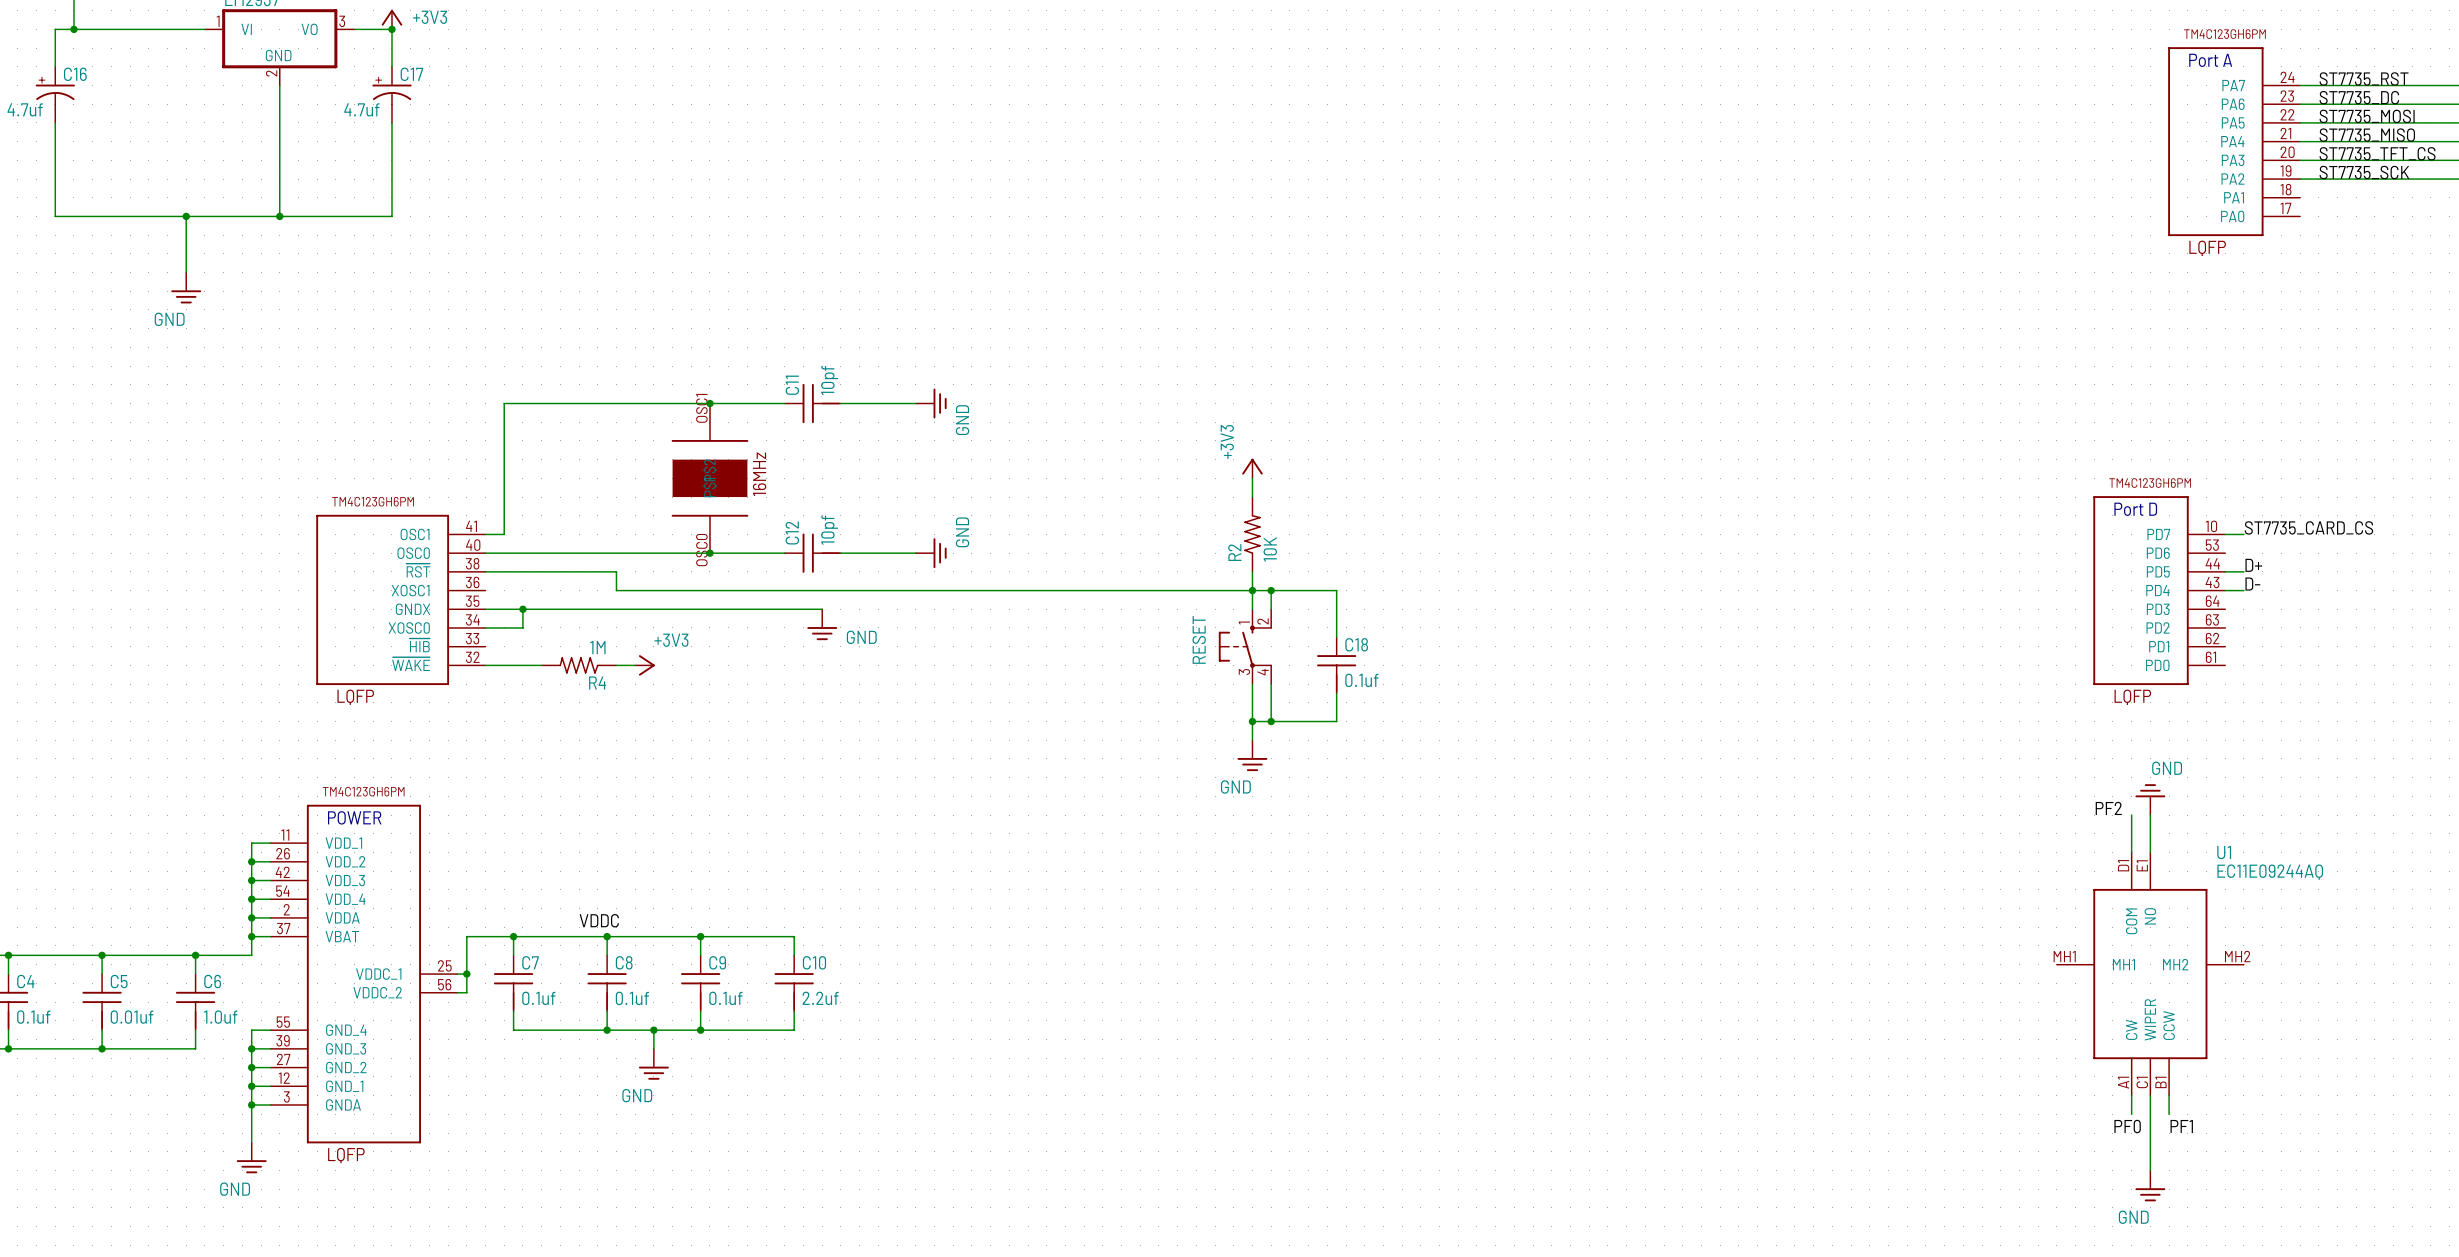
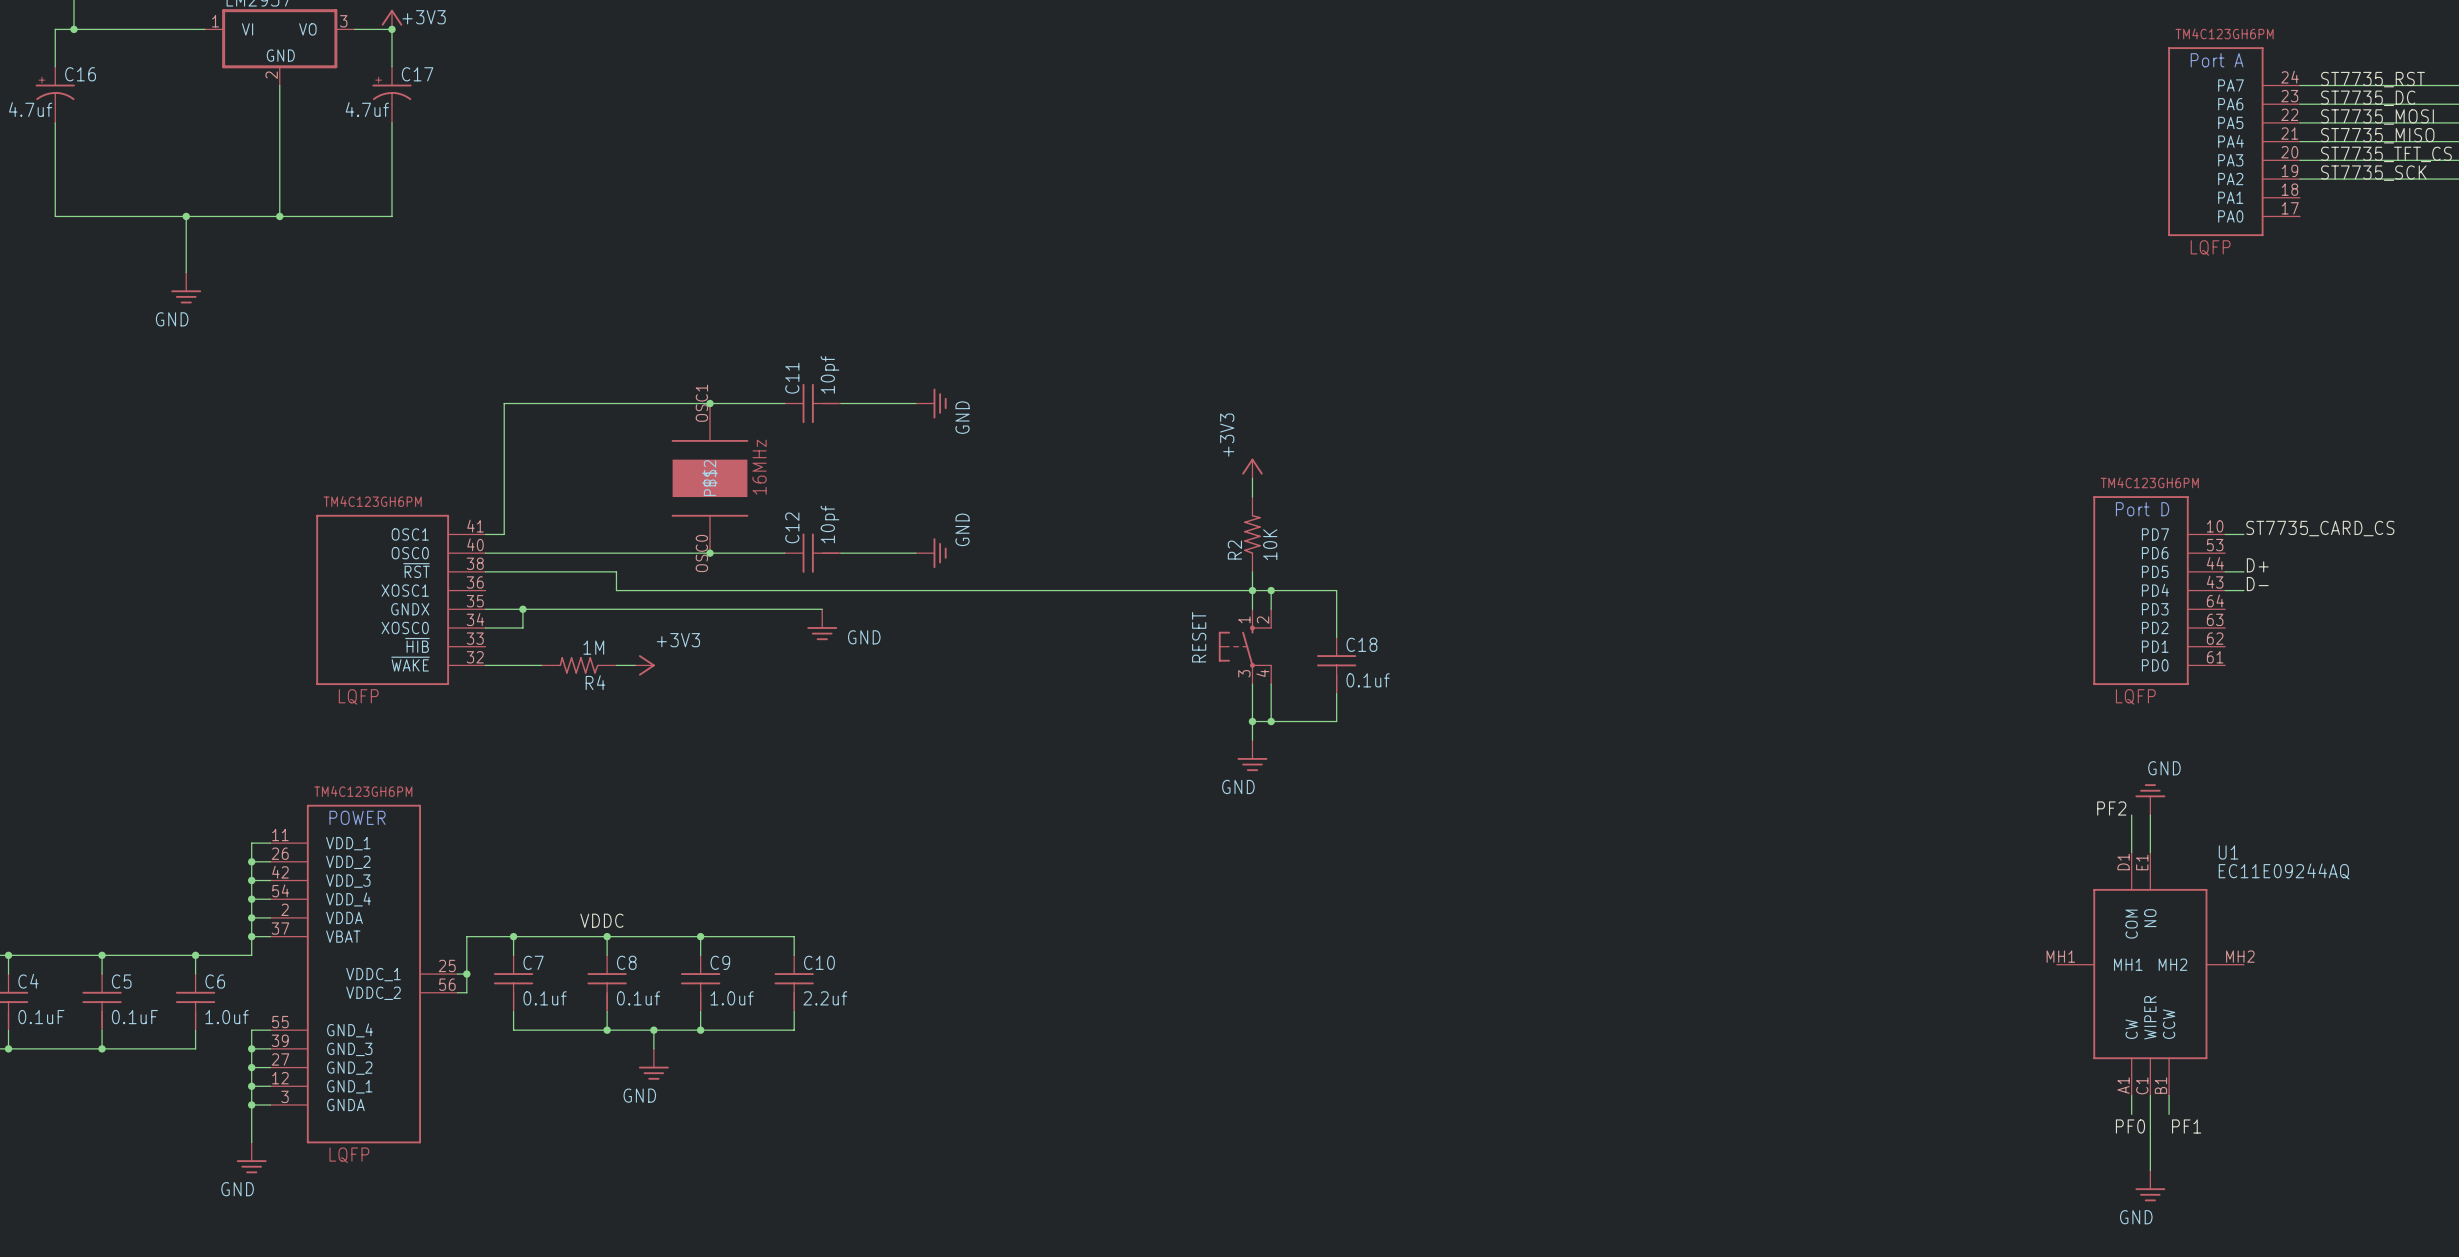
C9 value: 0.1uf (725, 998) -> 1.0uf (732, 998)
C4 value: 0.1uf (33, 1017) -> 0.1uF (41, 1017)
C5 value: 0.01uf (132, 1017) -> 0.1uF (134, 1017)

